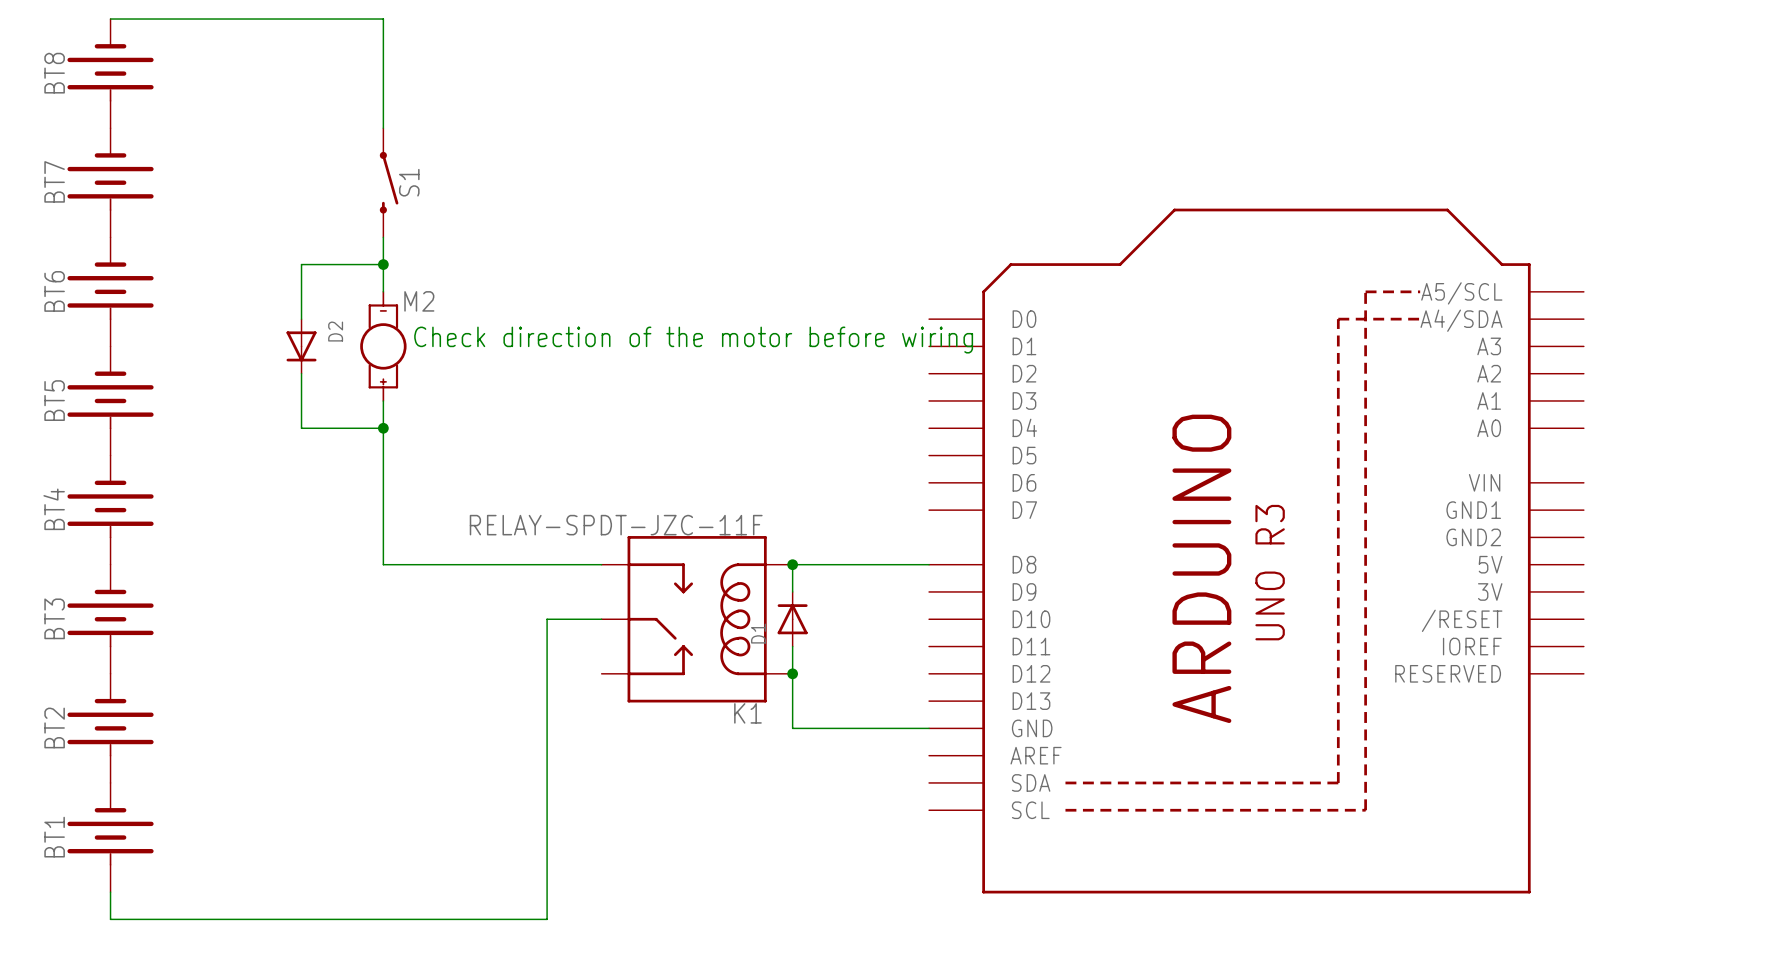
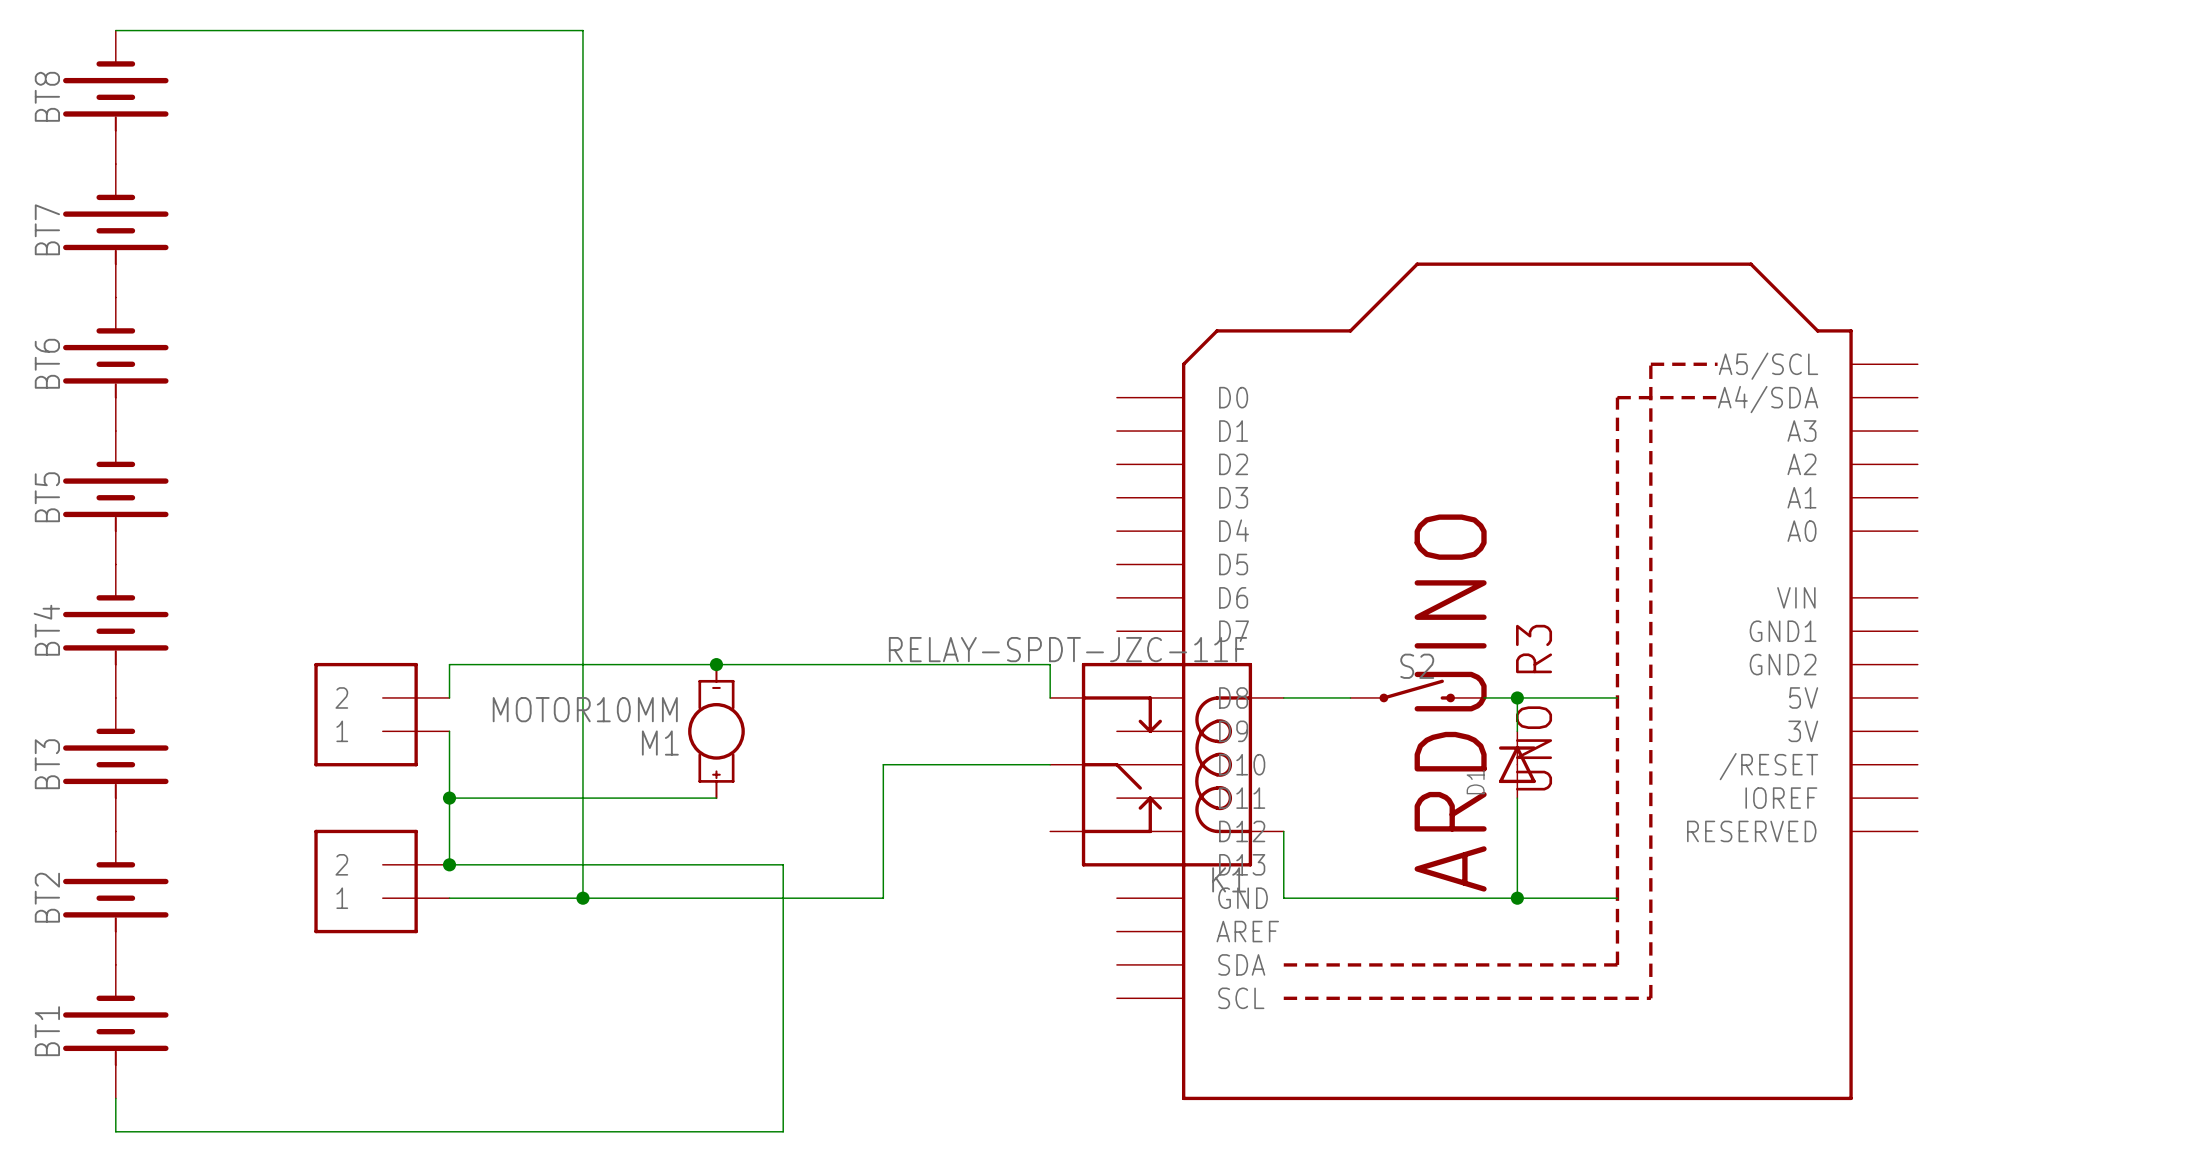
wire: (383, 19) (383, 128) -> (449, 30) (582, 30) (582, 898)
S1: (389, 182) -> none
wire: (383, 237) (383, 291) -> none
wire: (383, 264) (301, 264) (301, 319) -> none
junction: (383, 264) -> none
text: Check direction of the motor before wiring (693, 340) -> none
D2: (301, 346) -> none
M2: (383, 346) -> none
wire: (301, 373) (301, 428) (383, 428) -> none
wire: (383, 400) (383, 537) -> (1050, 697) (1050, 664) (449, 664)
junction: (383, 428) -> none
junction: none -> (716, 664)
S2: none -> (1417, 690)
wire: (383, 564) (601, 564) -> (449, 798) (716, 798)
junction: (792, 564) -> none
wire: (929, 564) (792, 564) (792, 591) -> none
wire: none -> (1283, 697) (1350, 697)
wire: none -> (1483, 697) (1617, 697)
wire: none -> (1517, 697) (1517, 731)
junction: none -> (1517, 697)
part: none -> (381, 714)
M1: none -> MOTOR10MM (716, 731)
wire: (601, 619) (547, 619) (547, 919) -> (449, 731) (449, 864) (783, 864) (783, 1131) (649, 1131)
K1 position: (697, 619) -> (1166, 764)
D1 position: (792, 619) -> (1517, 764)
wire: none -> (1050, 764) (883, 764) (883, 898) (449, 898)
junction: none -> (449, 798)
wire: (792, 646) (792, 728) (929, 728) -> none
wire: none -> (1517, 798) (1517, 898)
junction: (792, 673) -> none
wire: none -> (1283, 831) (1283, 898) (1617, 898)
junction: none -> (449, 864)
part: none -> (381, 881)
junction: none -> (582, 898)
junction: none -> (1517, 898)

